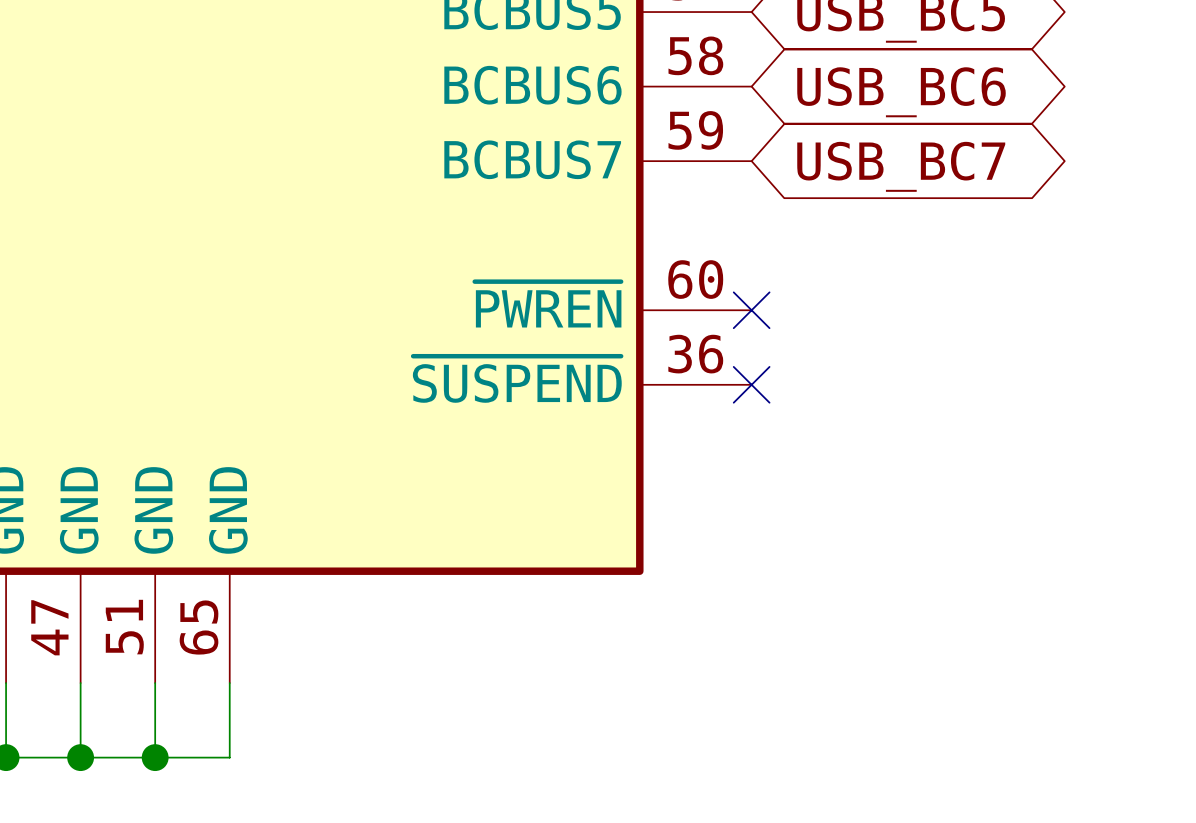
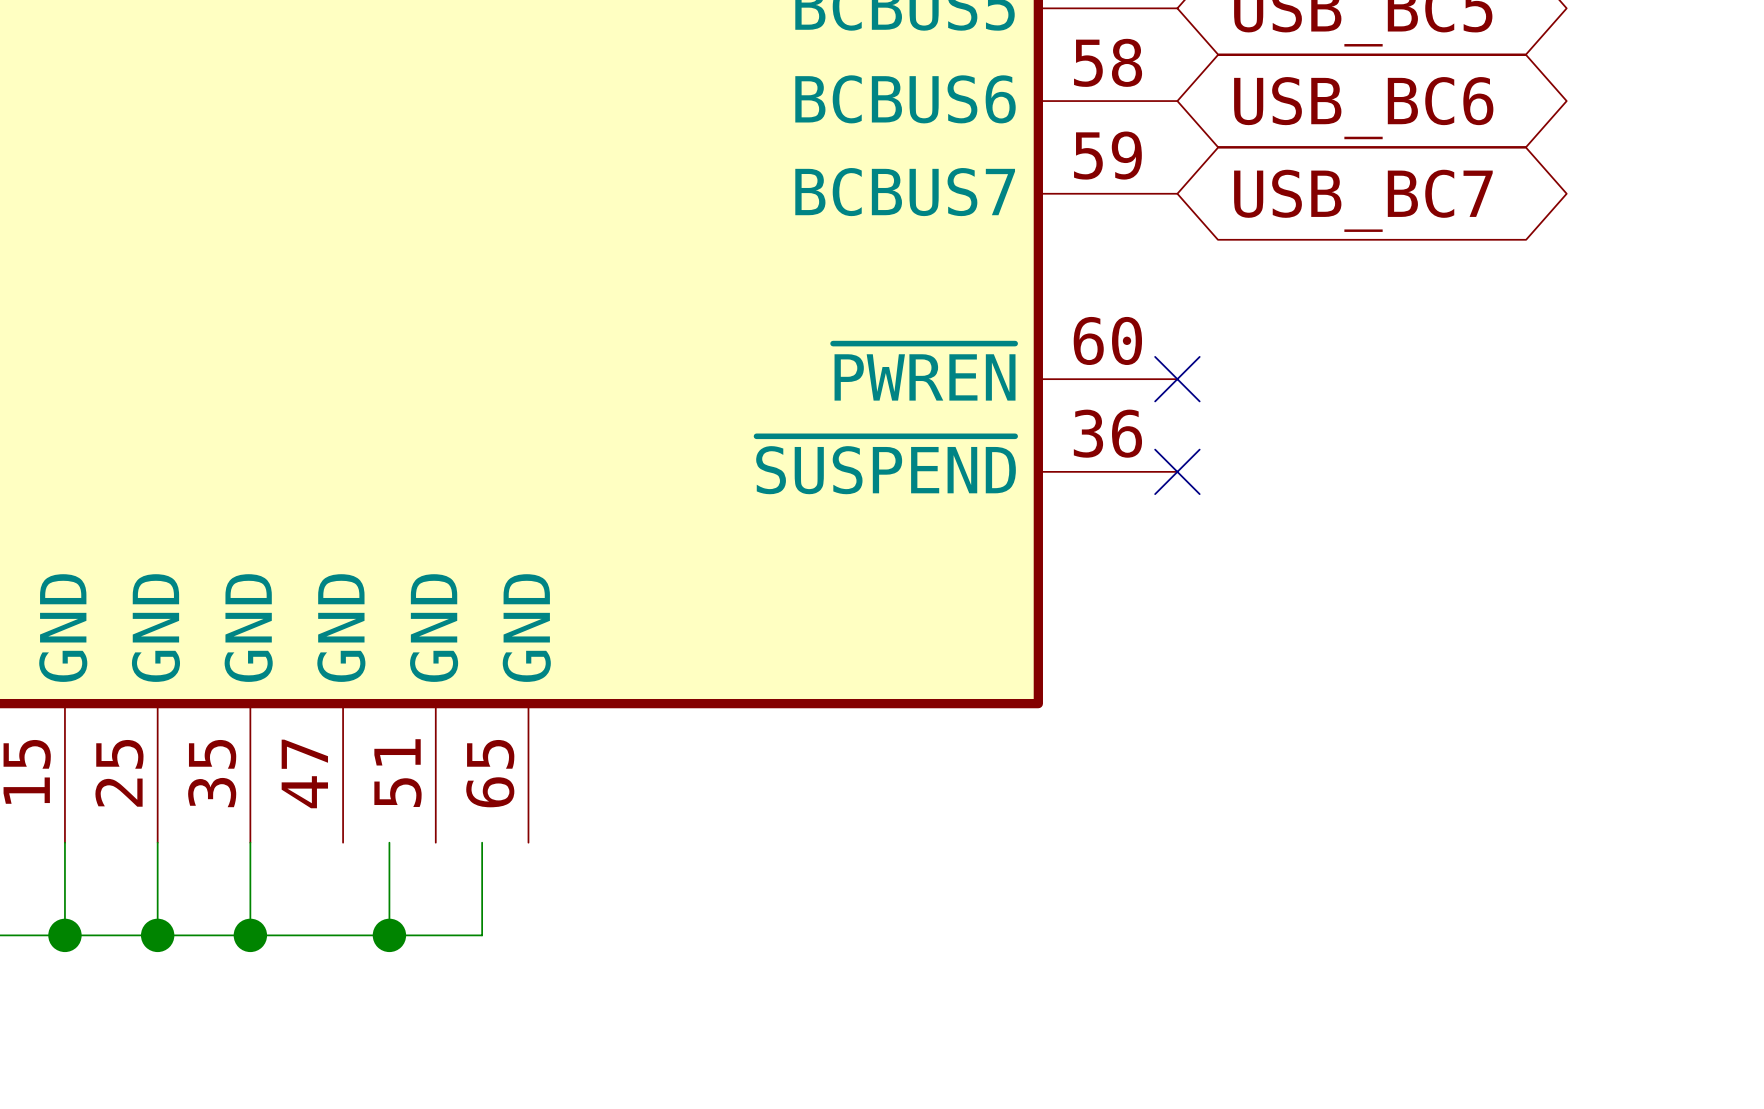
wire: (80, 683) (80, 757) -> (389, 842) (389, 935)
wire: (155, 683) (155, 757) -> none
wire: (229, 683) (229, 757) (192, 757) -> (482, 842) (482, 935)
junction: (80, 757) -> none
junction: none -> (389, 935)
junction: (155, 757) -> none

